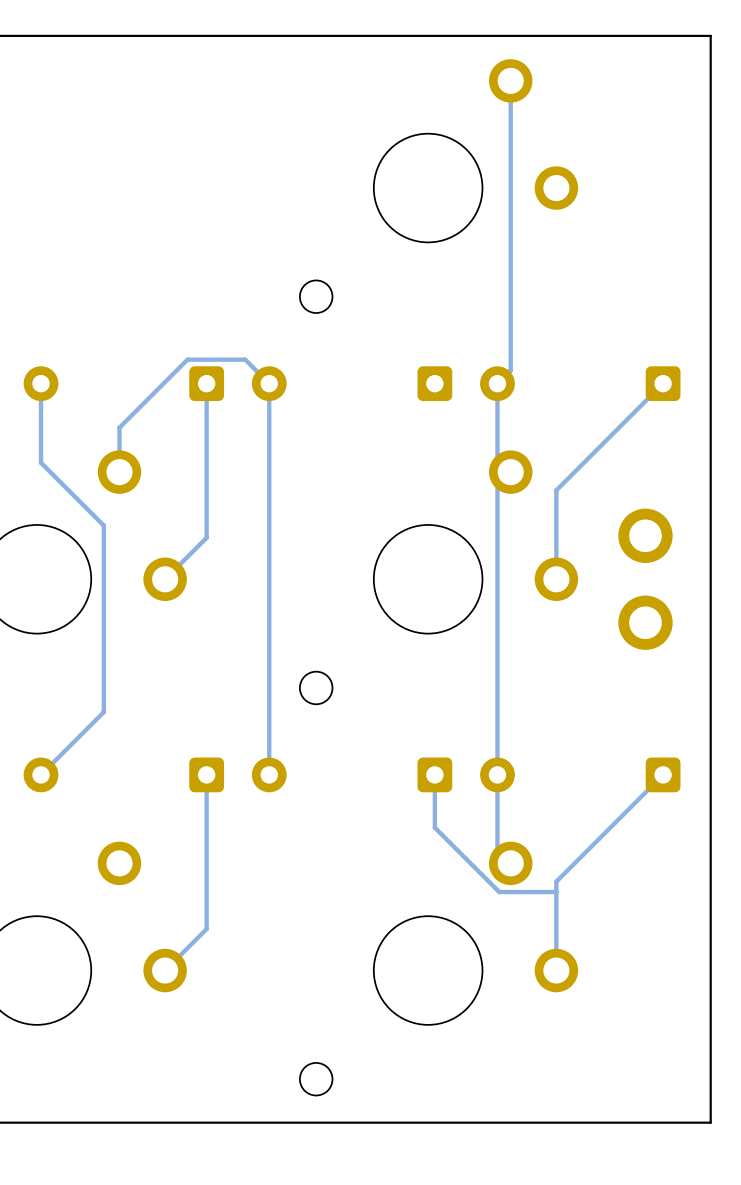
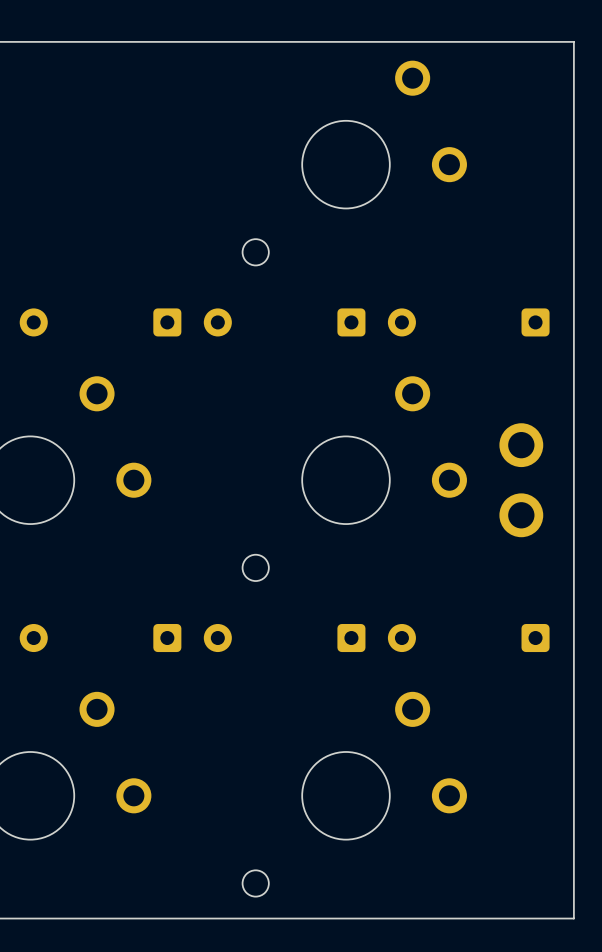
track: (510, 80) (510, 370) (497, 383) (497, 458) (510, 472) (497, 485) (497, 850) (510, 863) -> none
track: (41, 383) (41, 462) (103, 525) (103, 712) (41, 774) -> none
track: (206, 383) (206, 537) (165, 579) -> none
track: (663, 383) (556, 490) (556, 579) -> none
track: (119, 472) (119, 427) (187, 359) (245, 359) (269, 383) (269, 774) -> none
track: (206, 774) (206, 929) (165, 970) -> none
track: (434, 774) (434, 827) (499, 892) (556, 892) -> none
track: (663, 774) (556, 881) (556, 970) -> none

